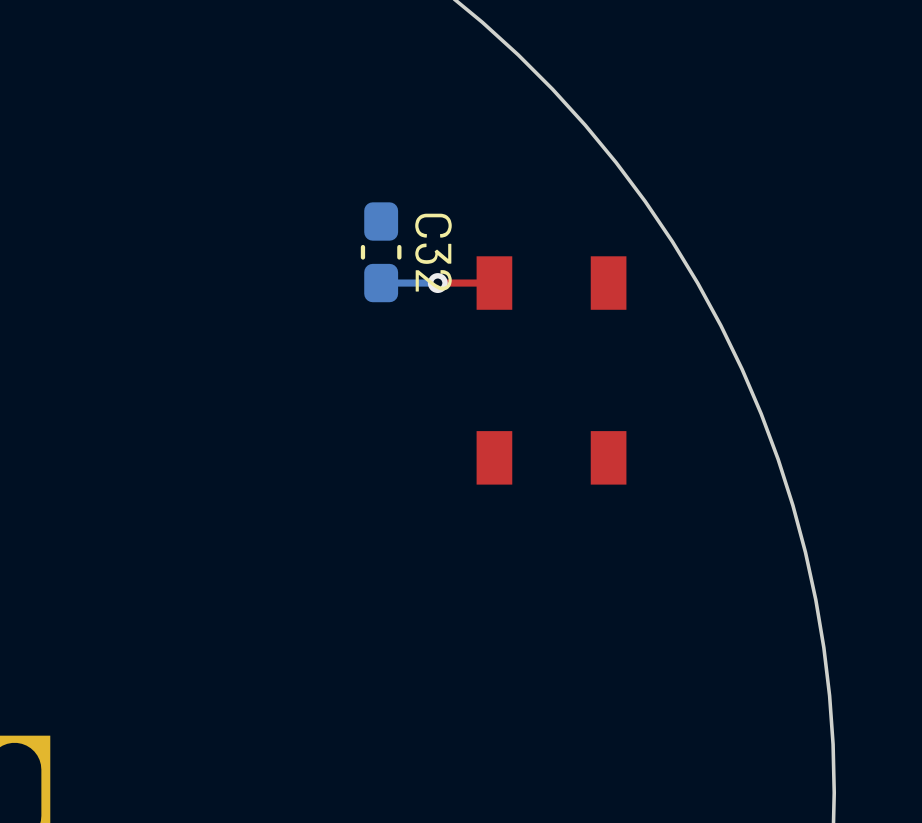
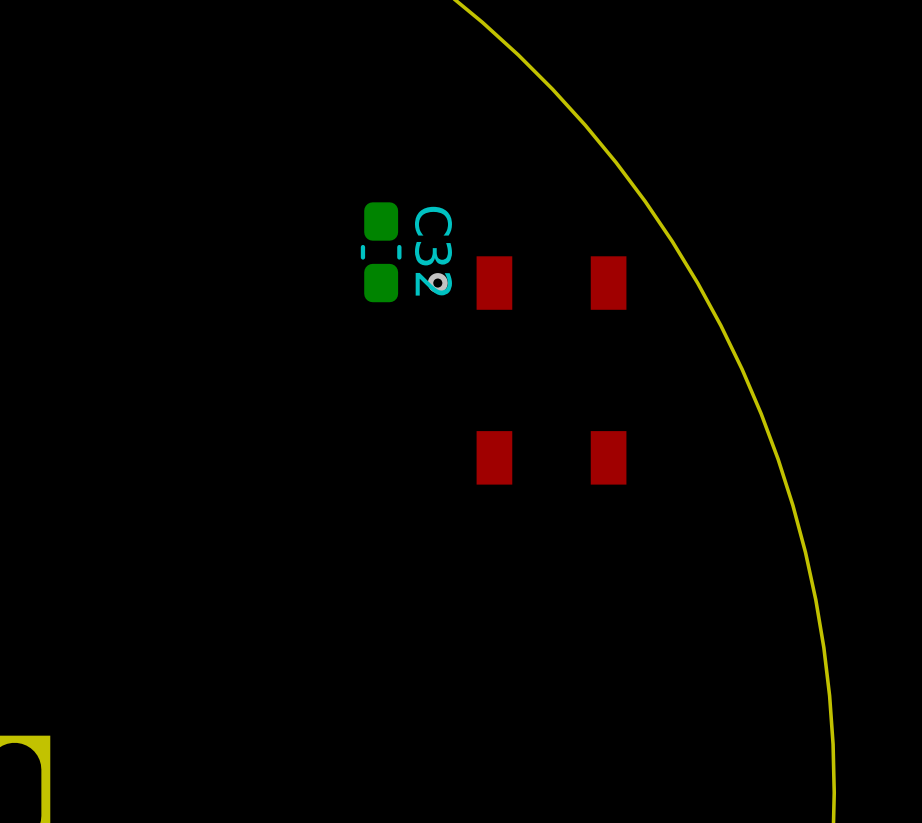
bottom track: (437, 283) (381, 283) -> none
top track: (494, 283) (437, 283) -> none

